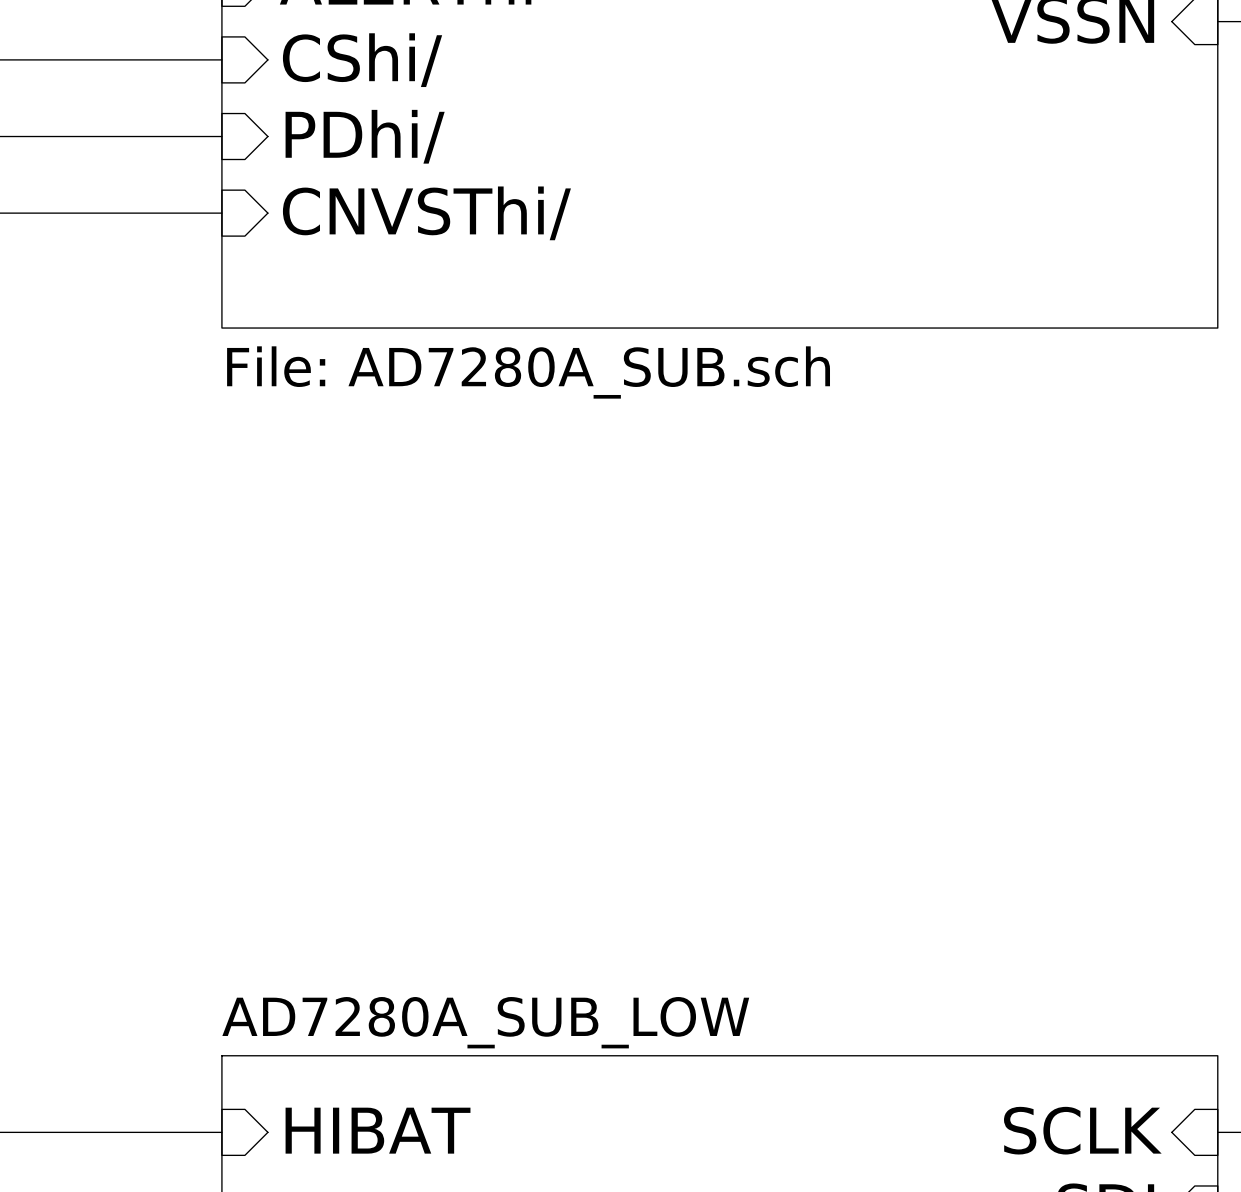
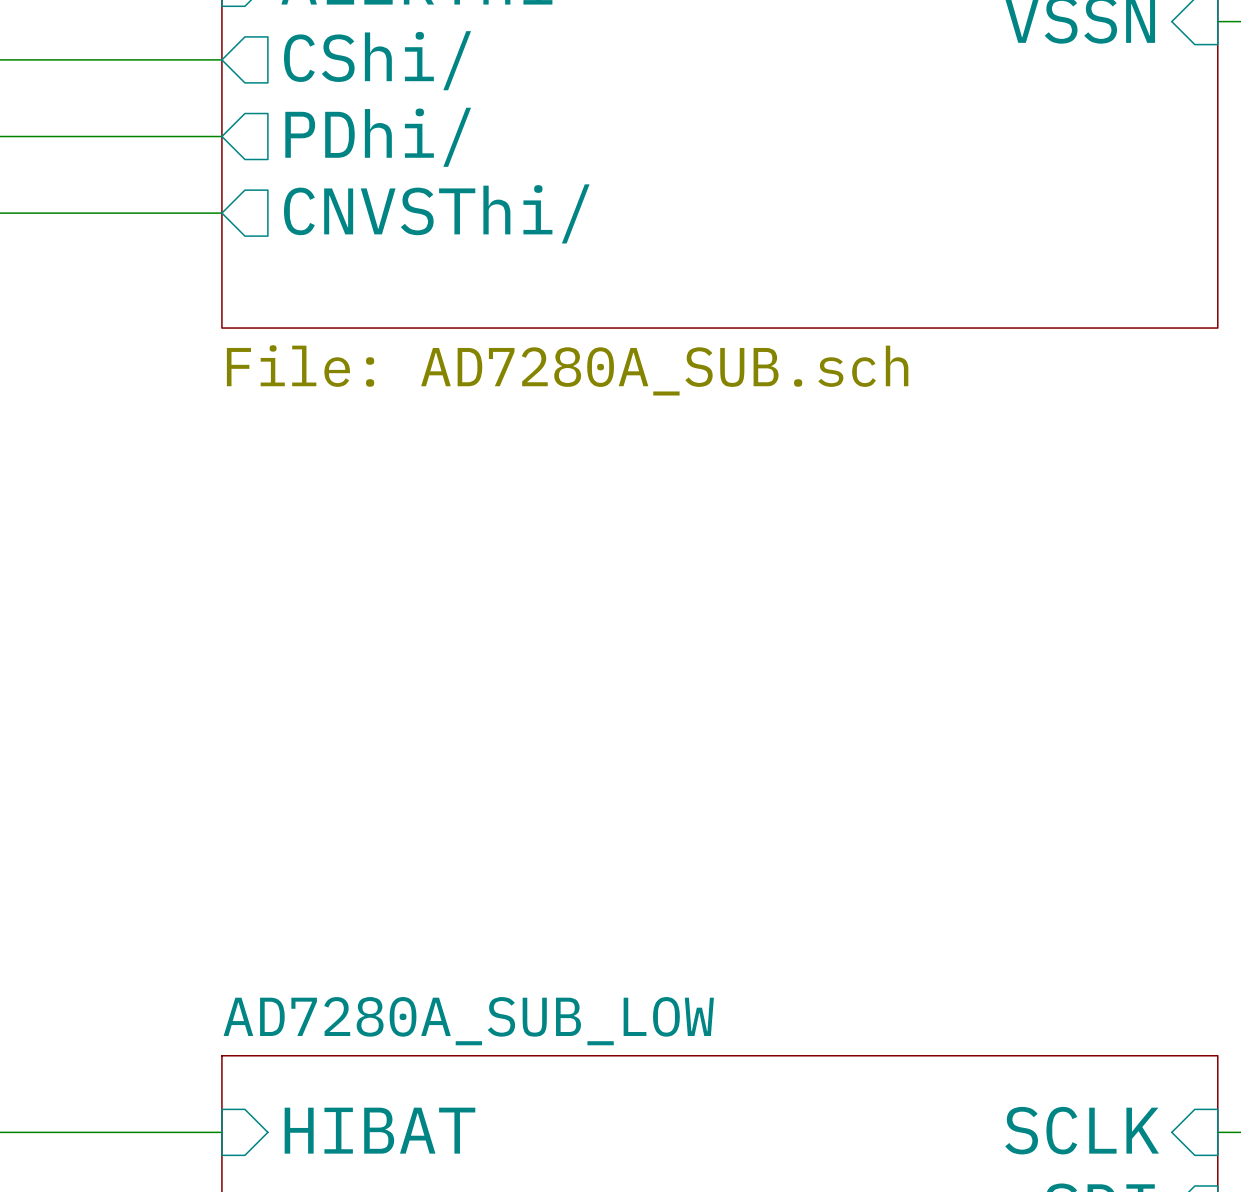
sheet pin shape: input (362, 60) -> output (377, 60)
sheet pin shape: input (365, 136) -> output (378, 137)
sheet pin shape: input (426, 213) -> output (436, 213)

